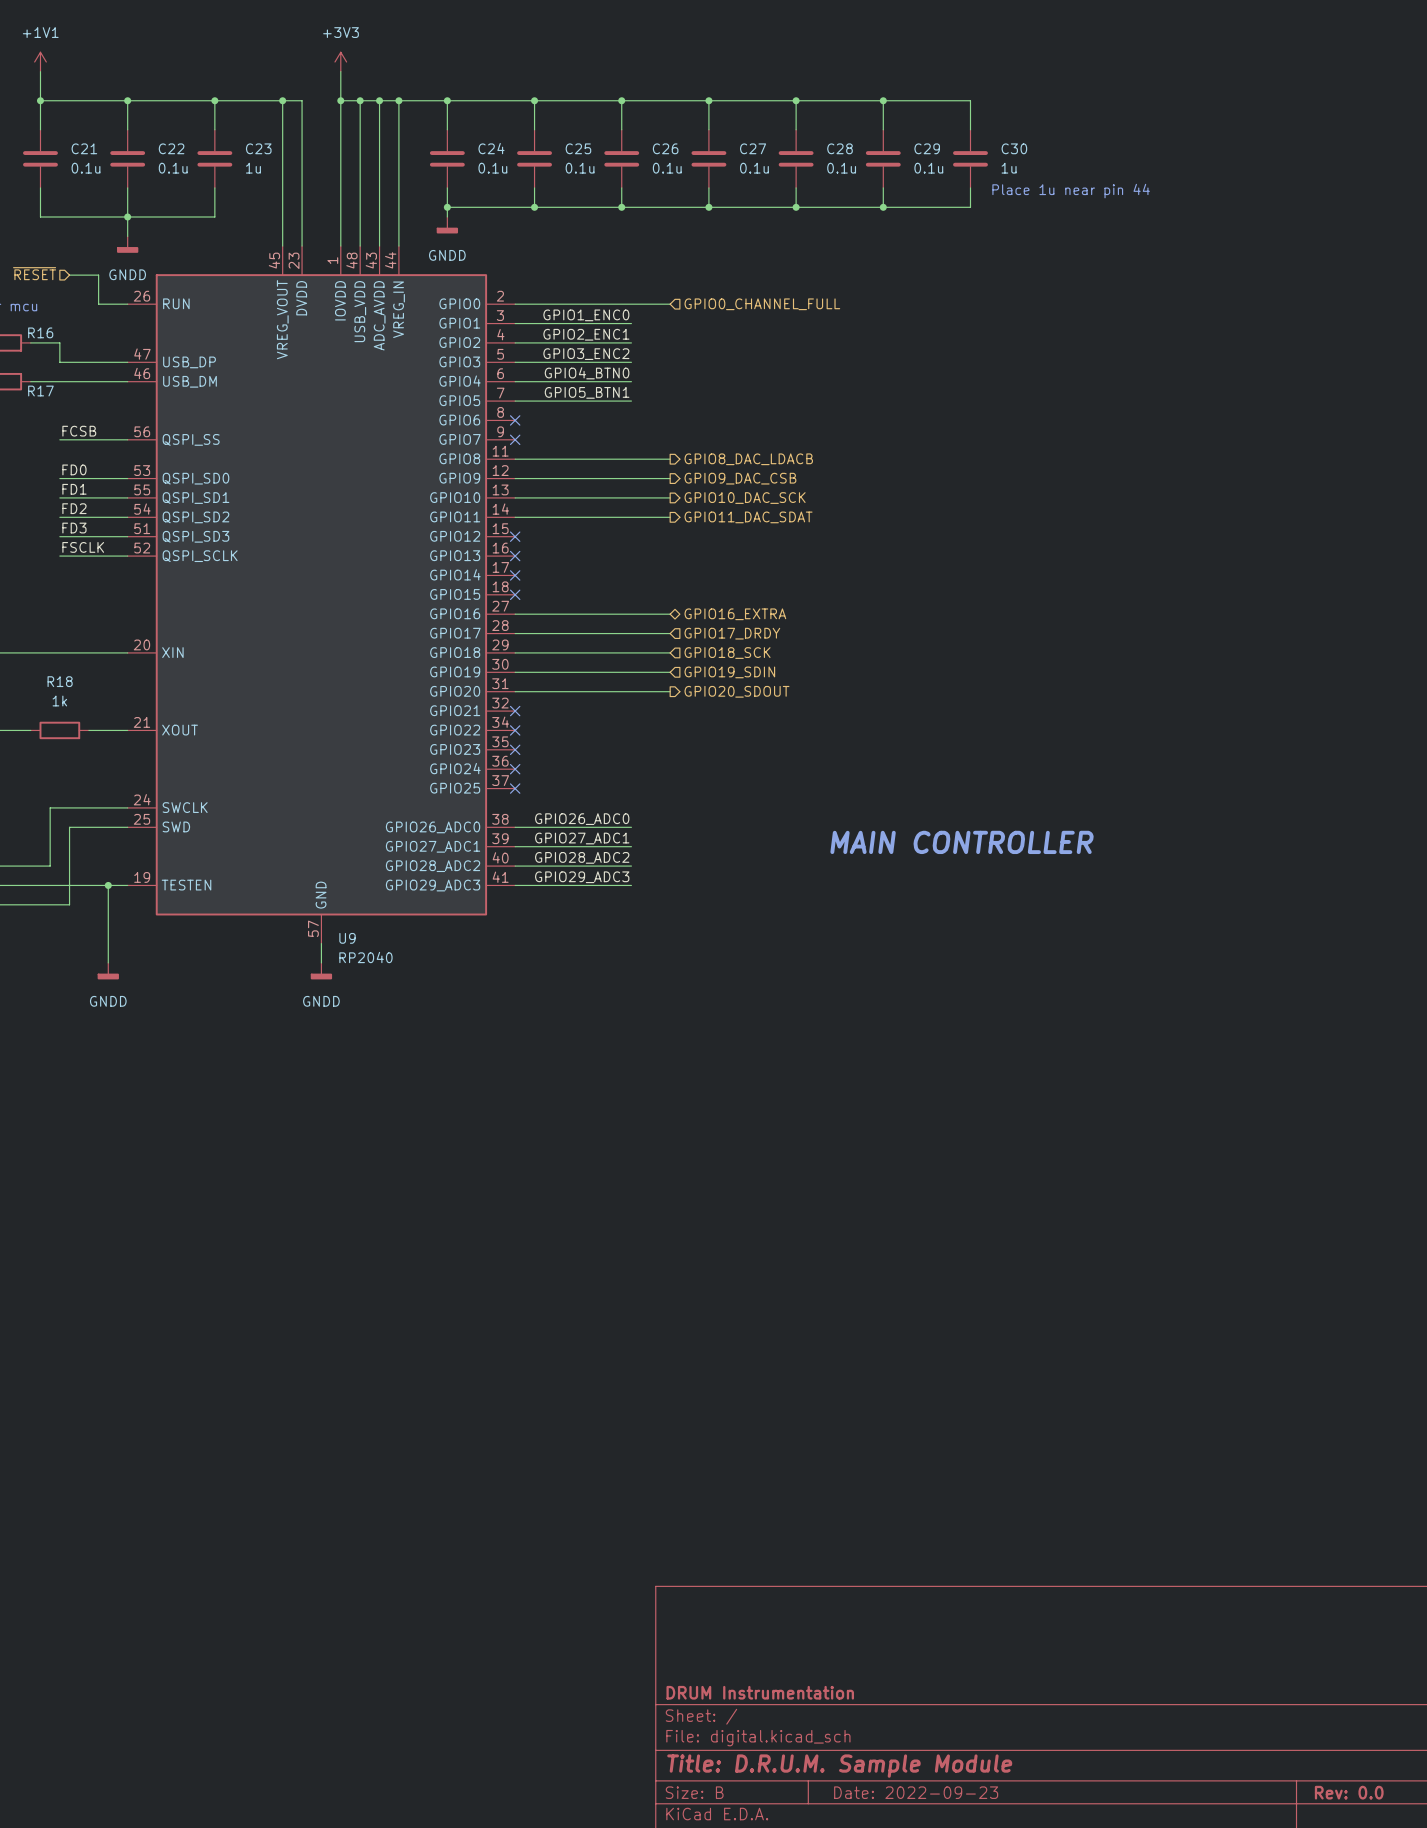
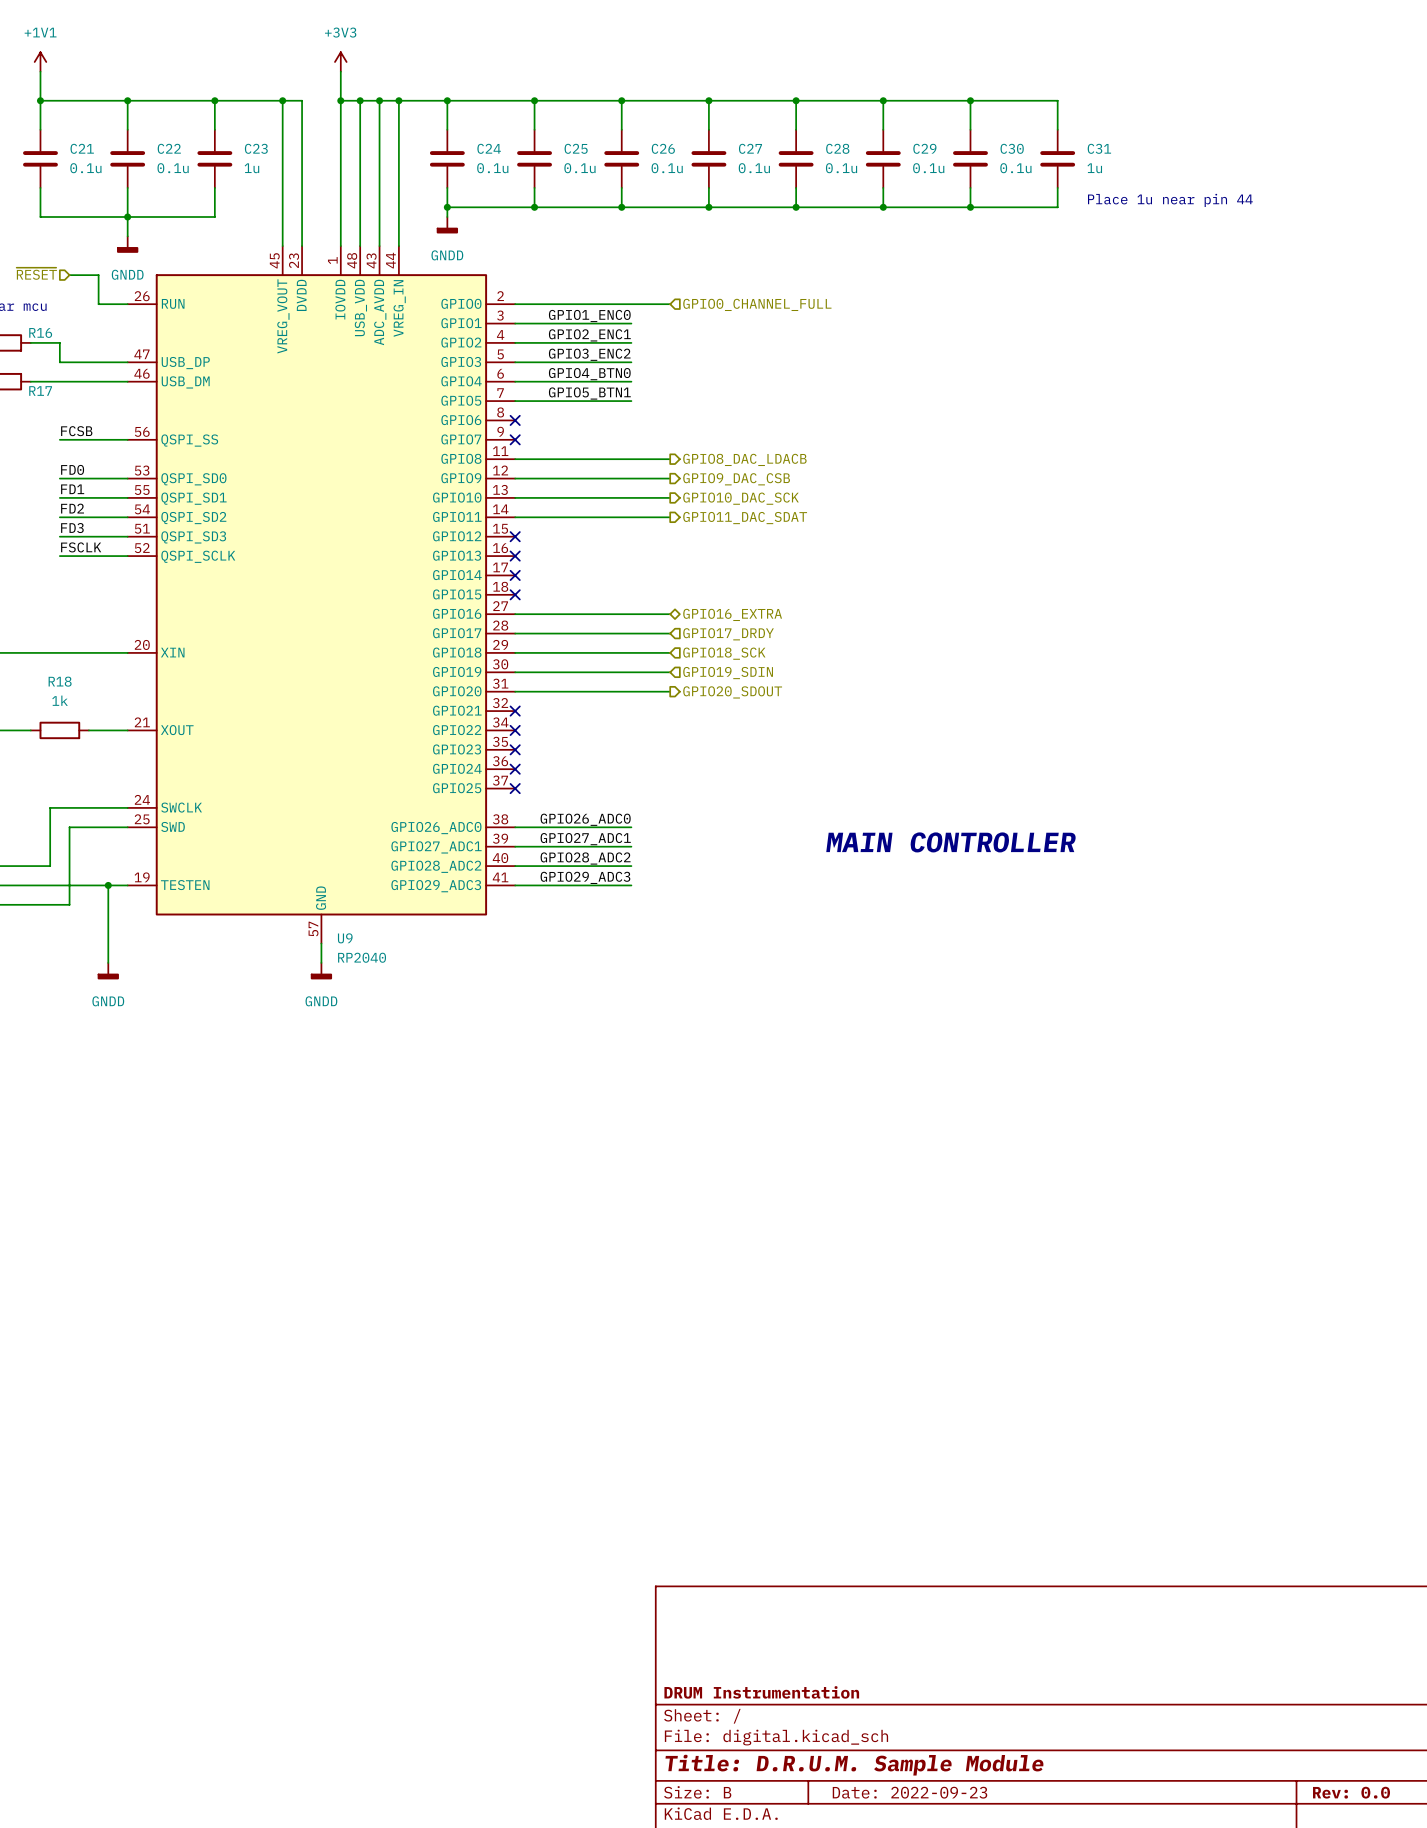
wire: none -> (970, 100) (1057, 100) (1057, 129)
junction: none -> (970, 100)
C31: none -> 1u (1057, 158)
C30 value: 1u (1009, 168) -> 0.1u (1015, 168)
wire: none -> (1057, 187) (1057, 207) (970, 207)
text position: Place 1u near pin 44 (1071, 191) -> Place 1u near pin 44 (1170, 200)
junction: none -> (970, 207)

